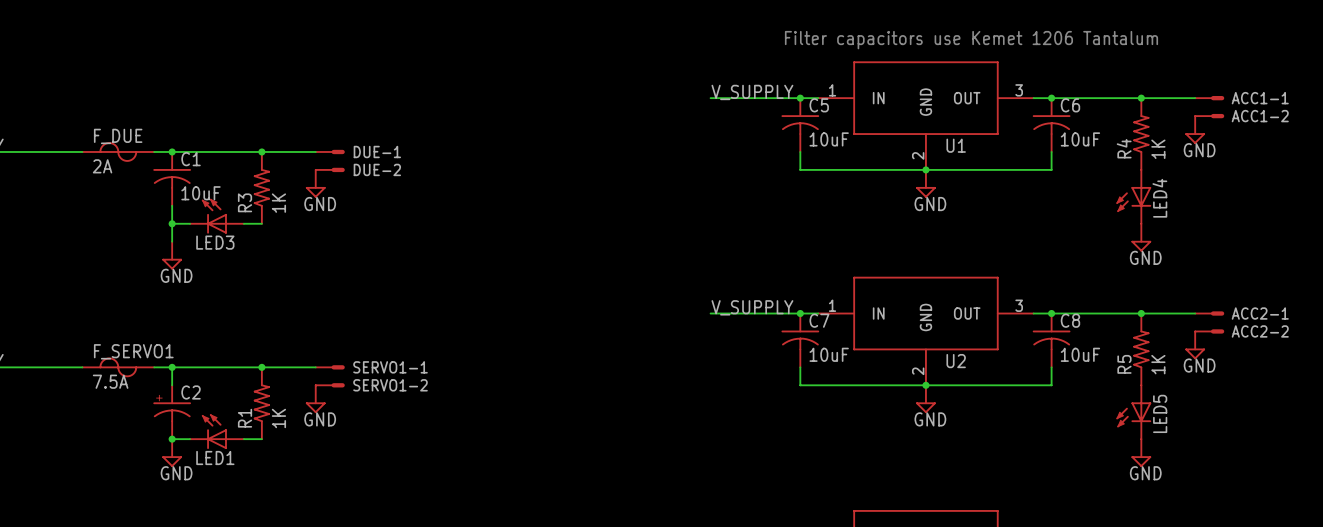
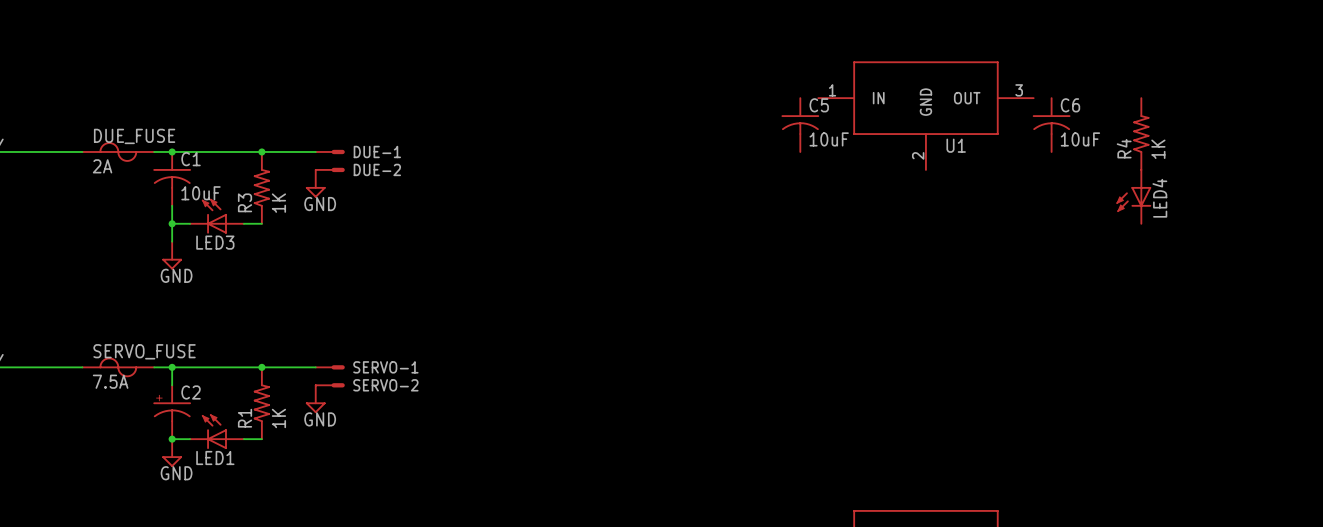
text: Filter capacitors use Kemet 1206 Tantalum (971, 40) -> none
label: V_SUPPLY (752, 92) -> none
wire: (710, 98) (818, 98) -> none
junction: (800, 98) -> none
wire: (1033, 98) (1195, 98) -> none
junction: (1051, 98) -> none
junction: (1141, 98) -> none
ACC1-1: (1209, 98) -> none
ACC1-2: (1209, 116) -> none
power symbol: GND (1195, 130) -> none
F_DUE name: F_DUE (118, 136) -> DUE_FUSE (134, 136)
wire: (800, 151) (800, 169) (1051, 169) (1051, 151) -> none
junction: (925, 169) -> none
power symbol: GND (925, 183) -> none
power symbol: GND (1141, 237) -> none
label: V_SUPPLY (752, 307) -> none
wire: (710, 313) (818, 313) -> none
junction: (800, 313) -> none
wire: (1033, 313) (1195, 313) -> none
junction: (1051, 313) -> none
junction: (1141, 313) -> none
ACC2-1: (1209, 313) -> none
U2: (925, 331) -> none
ACC2-2: (1209, 331) -> none
C7: 10uF (800, 340) -> none
C8: 10uF (1051, 340) -> none
power symbol: GND (1195, 345) -> none
R5: 1K (1141, 349) -> none
F_SERVO1 name: F_SERVO1 (133, 351) -> SERVO_FUSE (144, 351)
SERVO1-1 name: SERVO1-1 (390, 367) -> SERVO-1 (385, 367)
wire: (800, 367) (800, 385) (1051, 385) (1051, 367) -> none
SERVO1-2 name: SERVO1-2 (390, 385) -> SERVO-2 (385, 385)
junction: (925, 385) -> none
power symbol: GND (925, 399) -> none
LED5: (1133, 412) -> none
power symbol: GND (1141, 453) -> none

